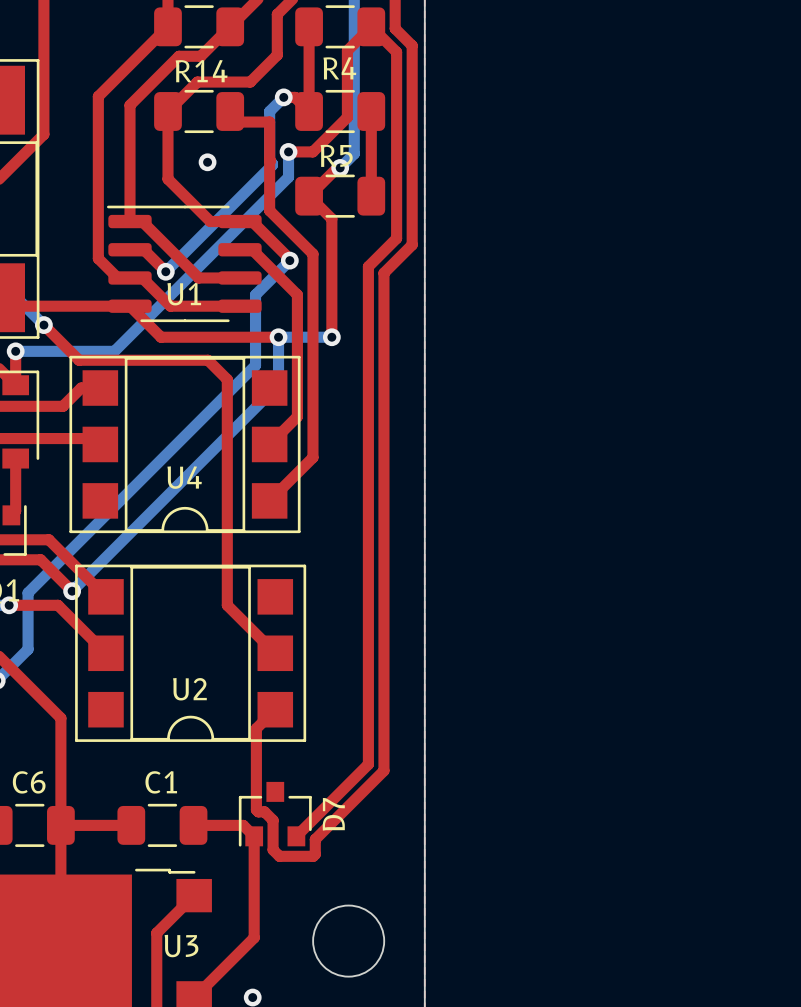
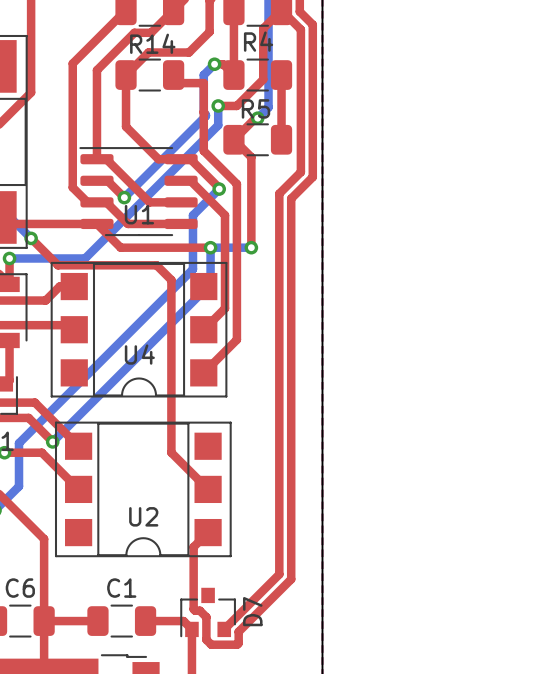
via: (207, 162) -> none

